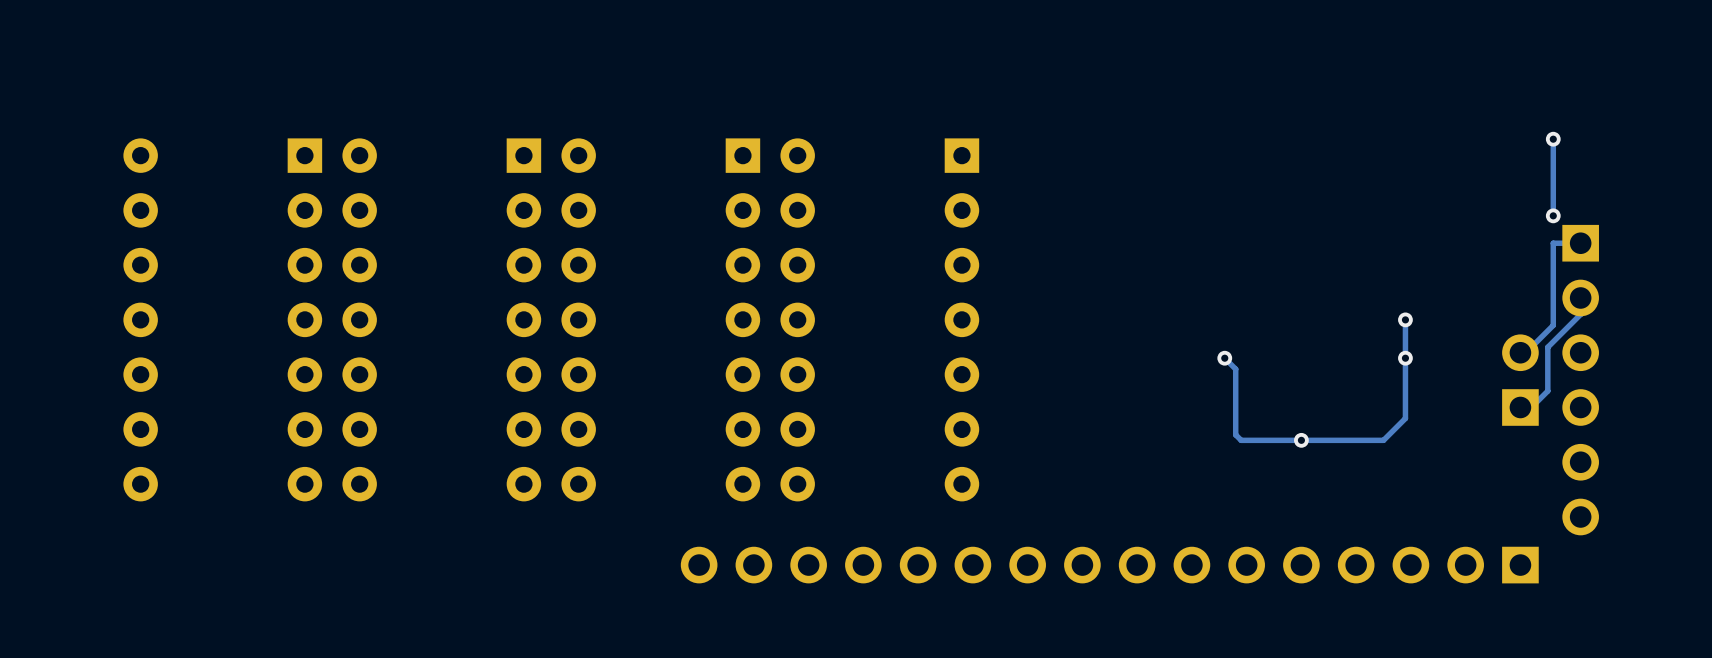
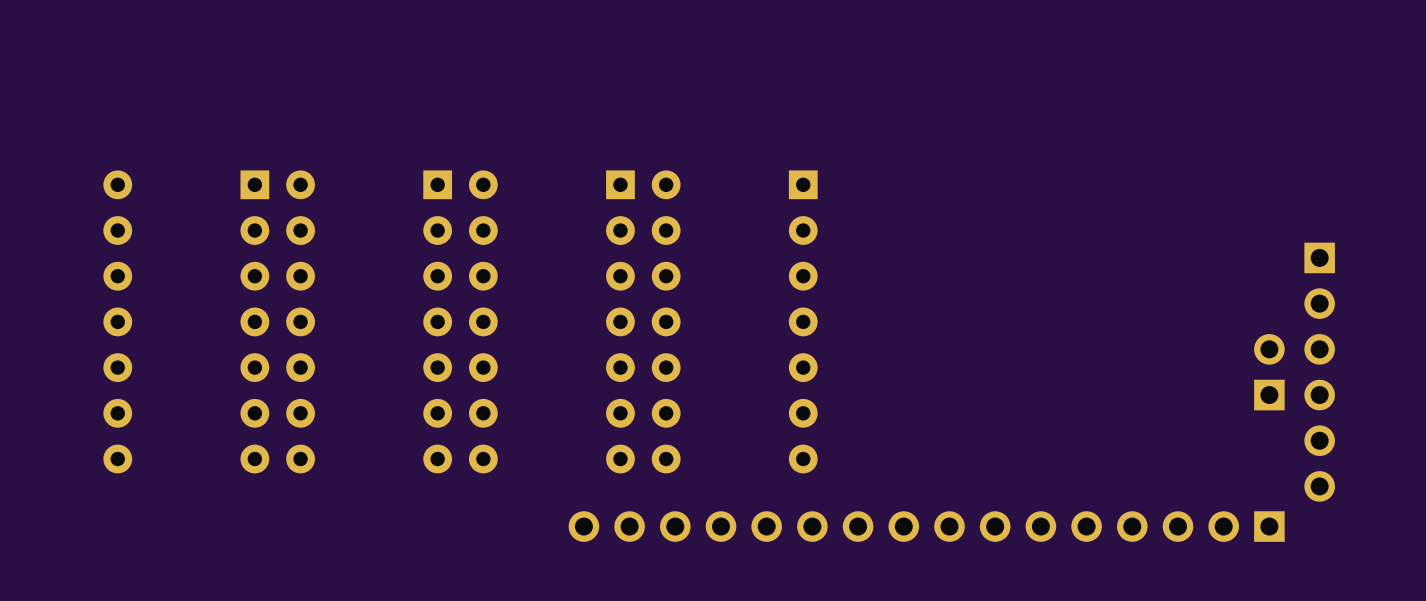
track: (1553, 139) (1553, 215) -> none
via: (1553, 139) -> none
via: (1553, 215) -> none
track: (1580, 243) (1553, 243) (1553, 325) (1525, 352) (1520, 352) -> none
track: (1580, 297) (1580, 314) (1547, 347) (1547, 391) (1531, 407) (1520, 407) -> none
track: (1405, 319) (1405, 418) (1383, 440) (1241, 440) (1235, 434) (1235, 369) (1224, 358) -> none
via: (1405, 319) -> none
via: (1224, 358) -> none
via: (1405, 358) -> none
via: (1301, 440) -> none

